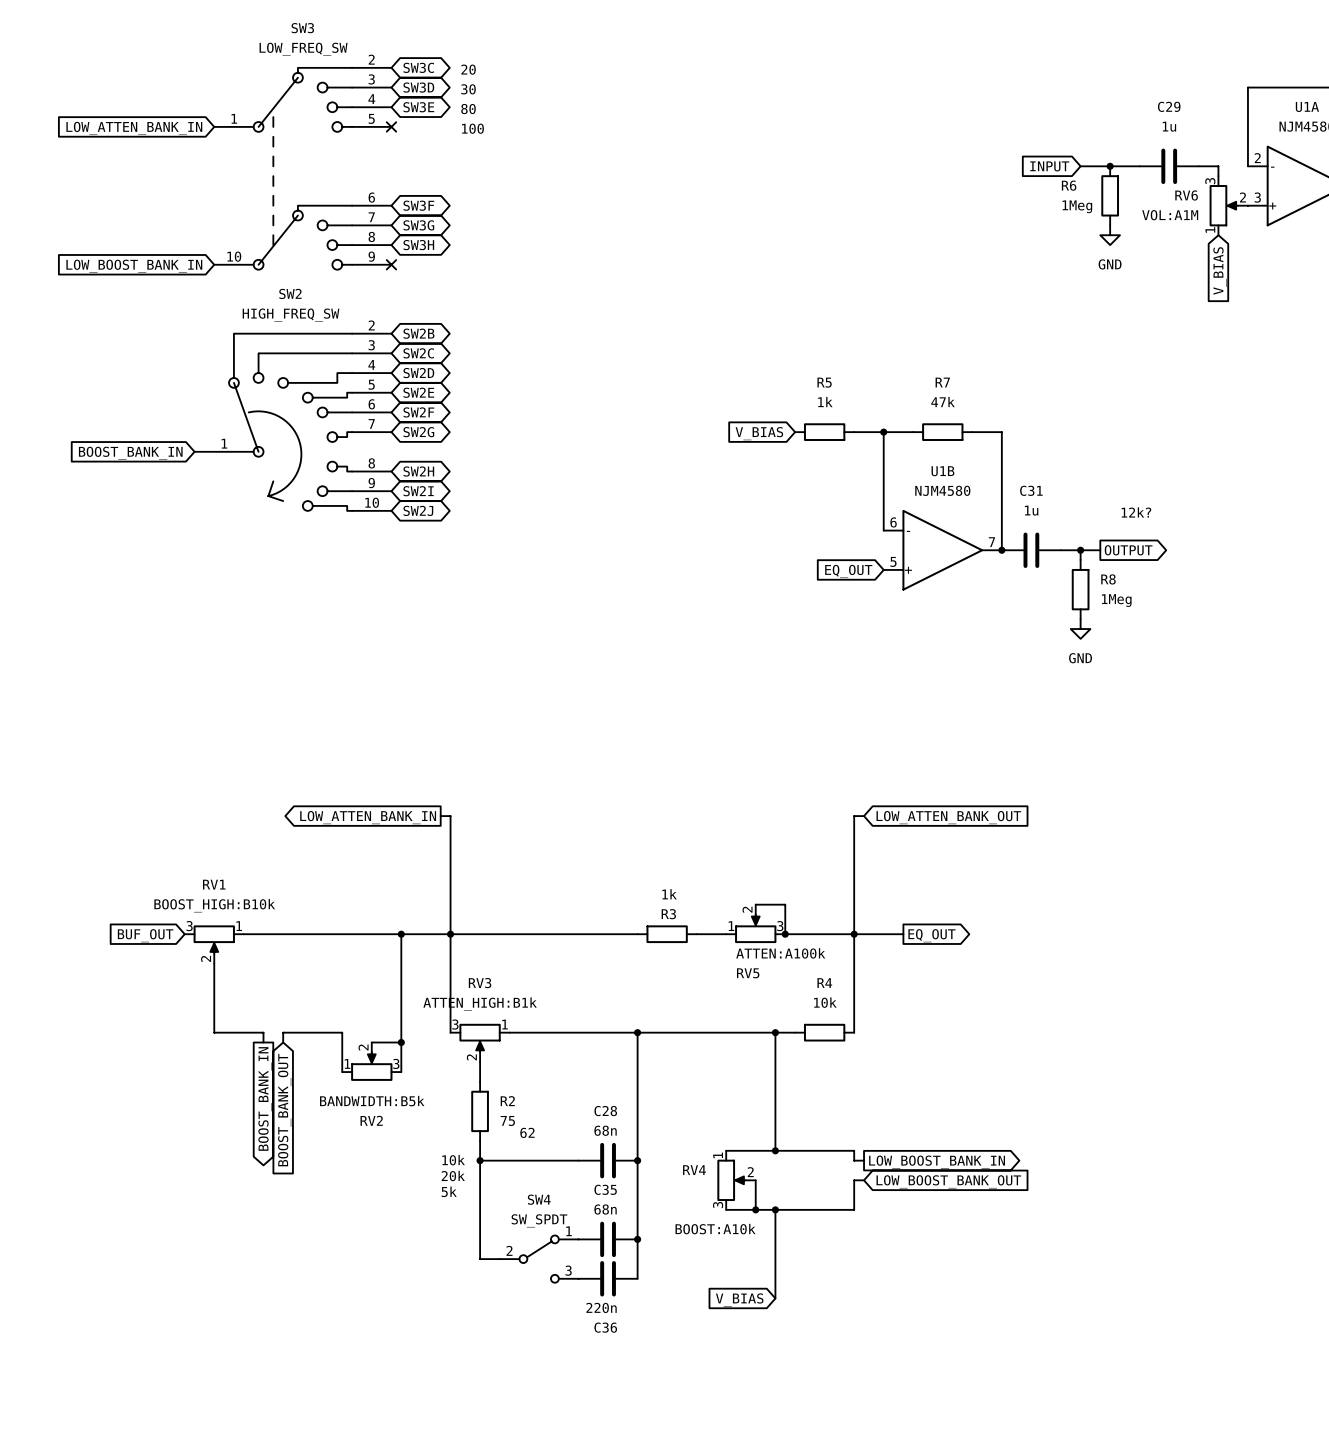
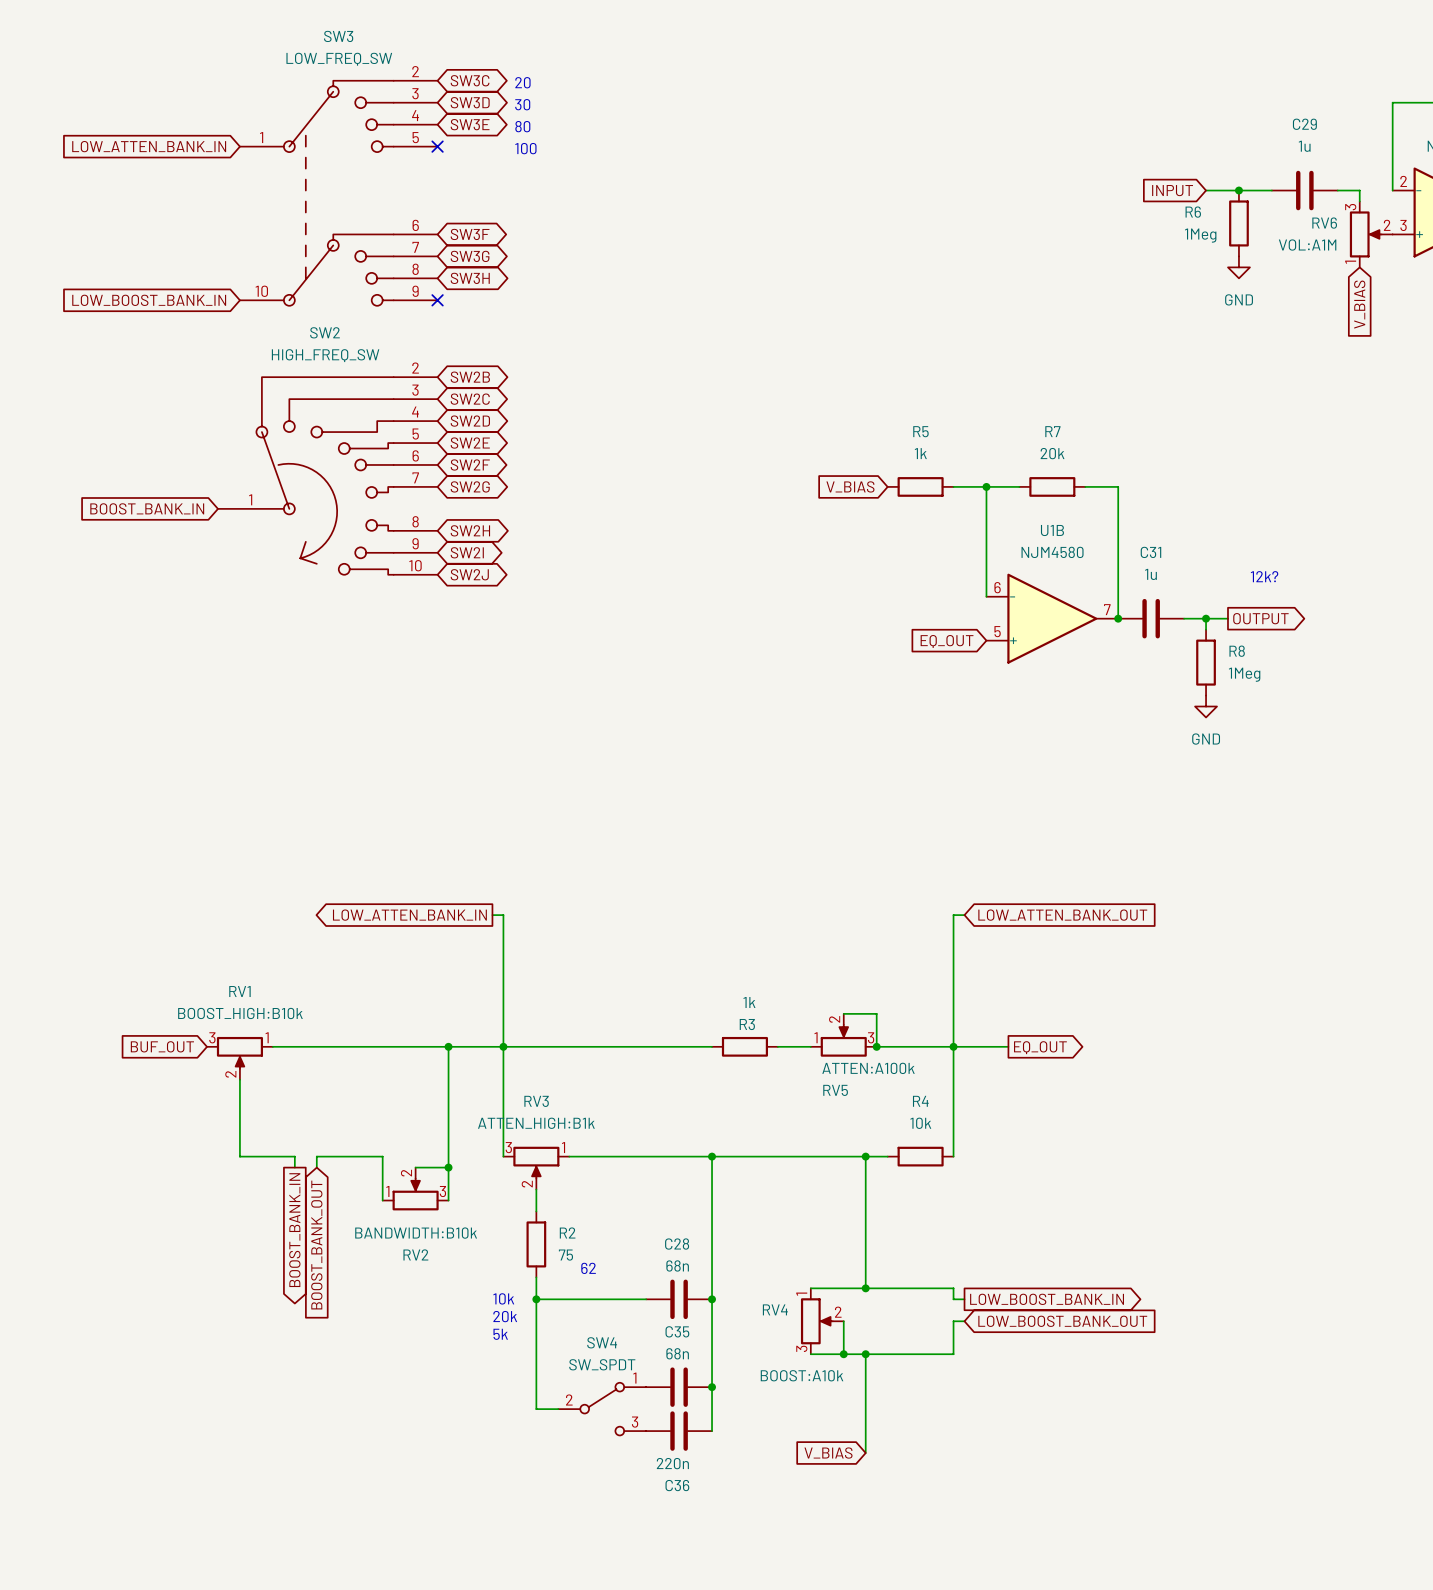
R7 value: 47k (943, 402) -> 20k (1052, 453)
RV2 value: BANDWIDTH:B5k (372, 1101) -> BANDWIDTH:B10k (416, 1233)

